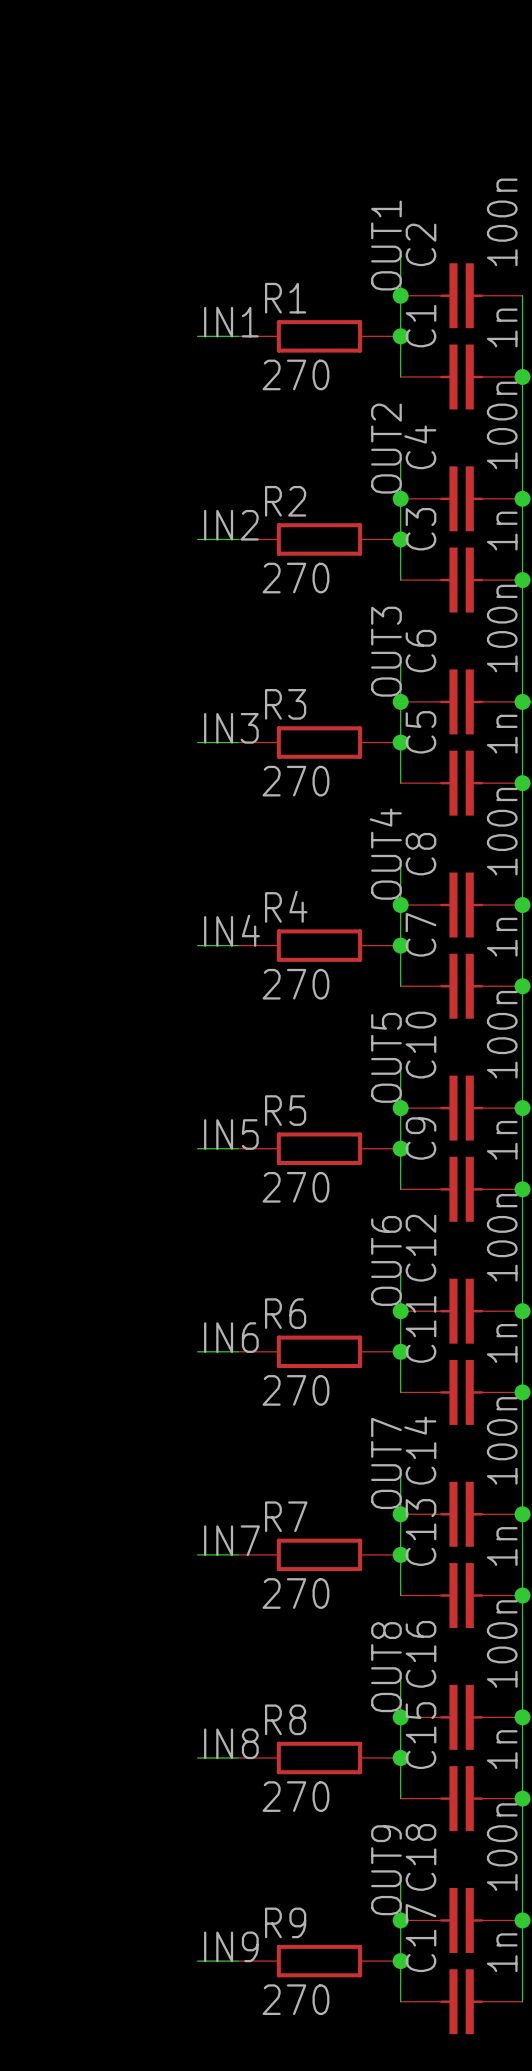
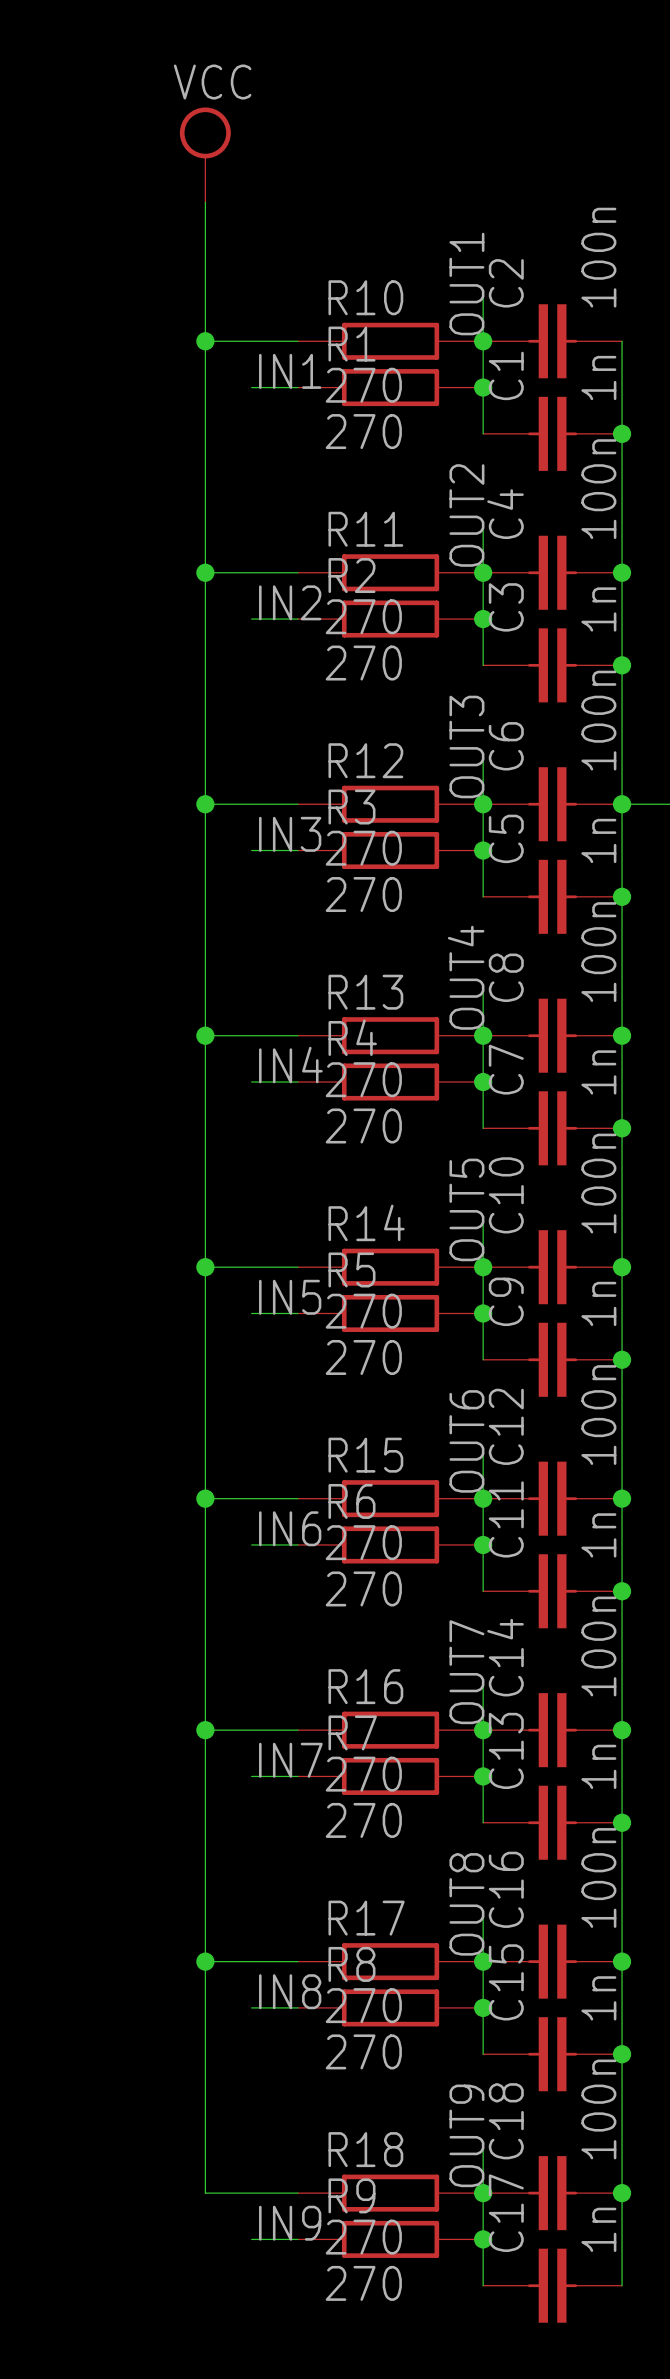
power symbol: none -> VCC (205, 154)
wire: none -> (205, 202) (205, 2193) (297, 2193)
wire: none -> (205, 341) (297, 341)
junction: none -> (205, 341)
R10: none -> 270 (390, 341)
wire: none -> (205, 572) (297, 572)
junction: none -> (205, 572)
R11: none -> 270 (390, 572)
wire: none -> (205, 804) (297, 804)
junction: none -> (205, 804)
R12: none -> 270 (390, 804)
wire: none -> (205, 1035) (297, 1035)
junction: none -> (205, 1035)
R13: none -> 270 (390, 1035)
wire: none -> (205, 1267) (297, 1267)
junction: none -> (205, 1267)
R14: none -> 270 (390, 1267)
wire: none -> (205, 1498) (297, 1498)
junction: none -> (205, 1498)
R15: none -> 270 (390, 1498)
wire: none -> (205, 1730) (297, 1730)
junction: none -> (205, 1730)
R16: none -> 270 (390, 1730)
wire: none -> (205, 1961) (297, 1961)
junction: none -> (205, 1961)
R17: none -> 270 (390, 1961)
R18: none -> 270 (390, 2193)

